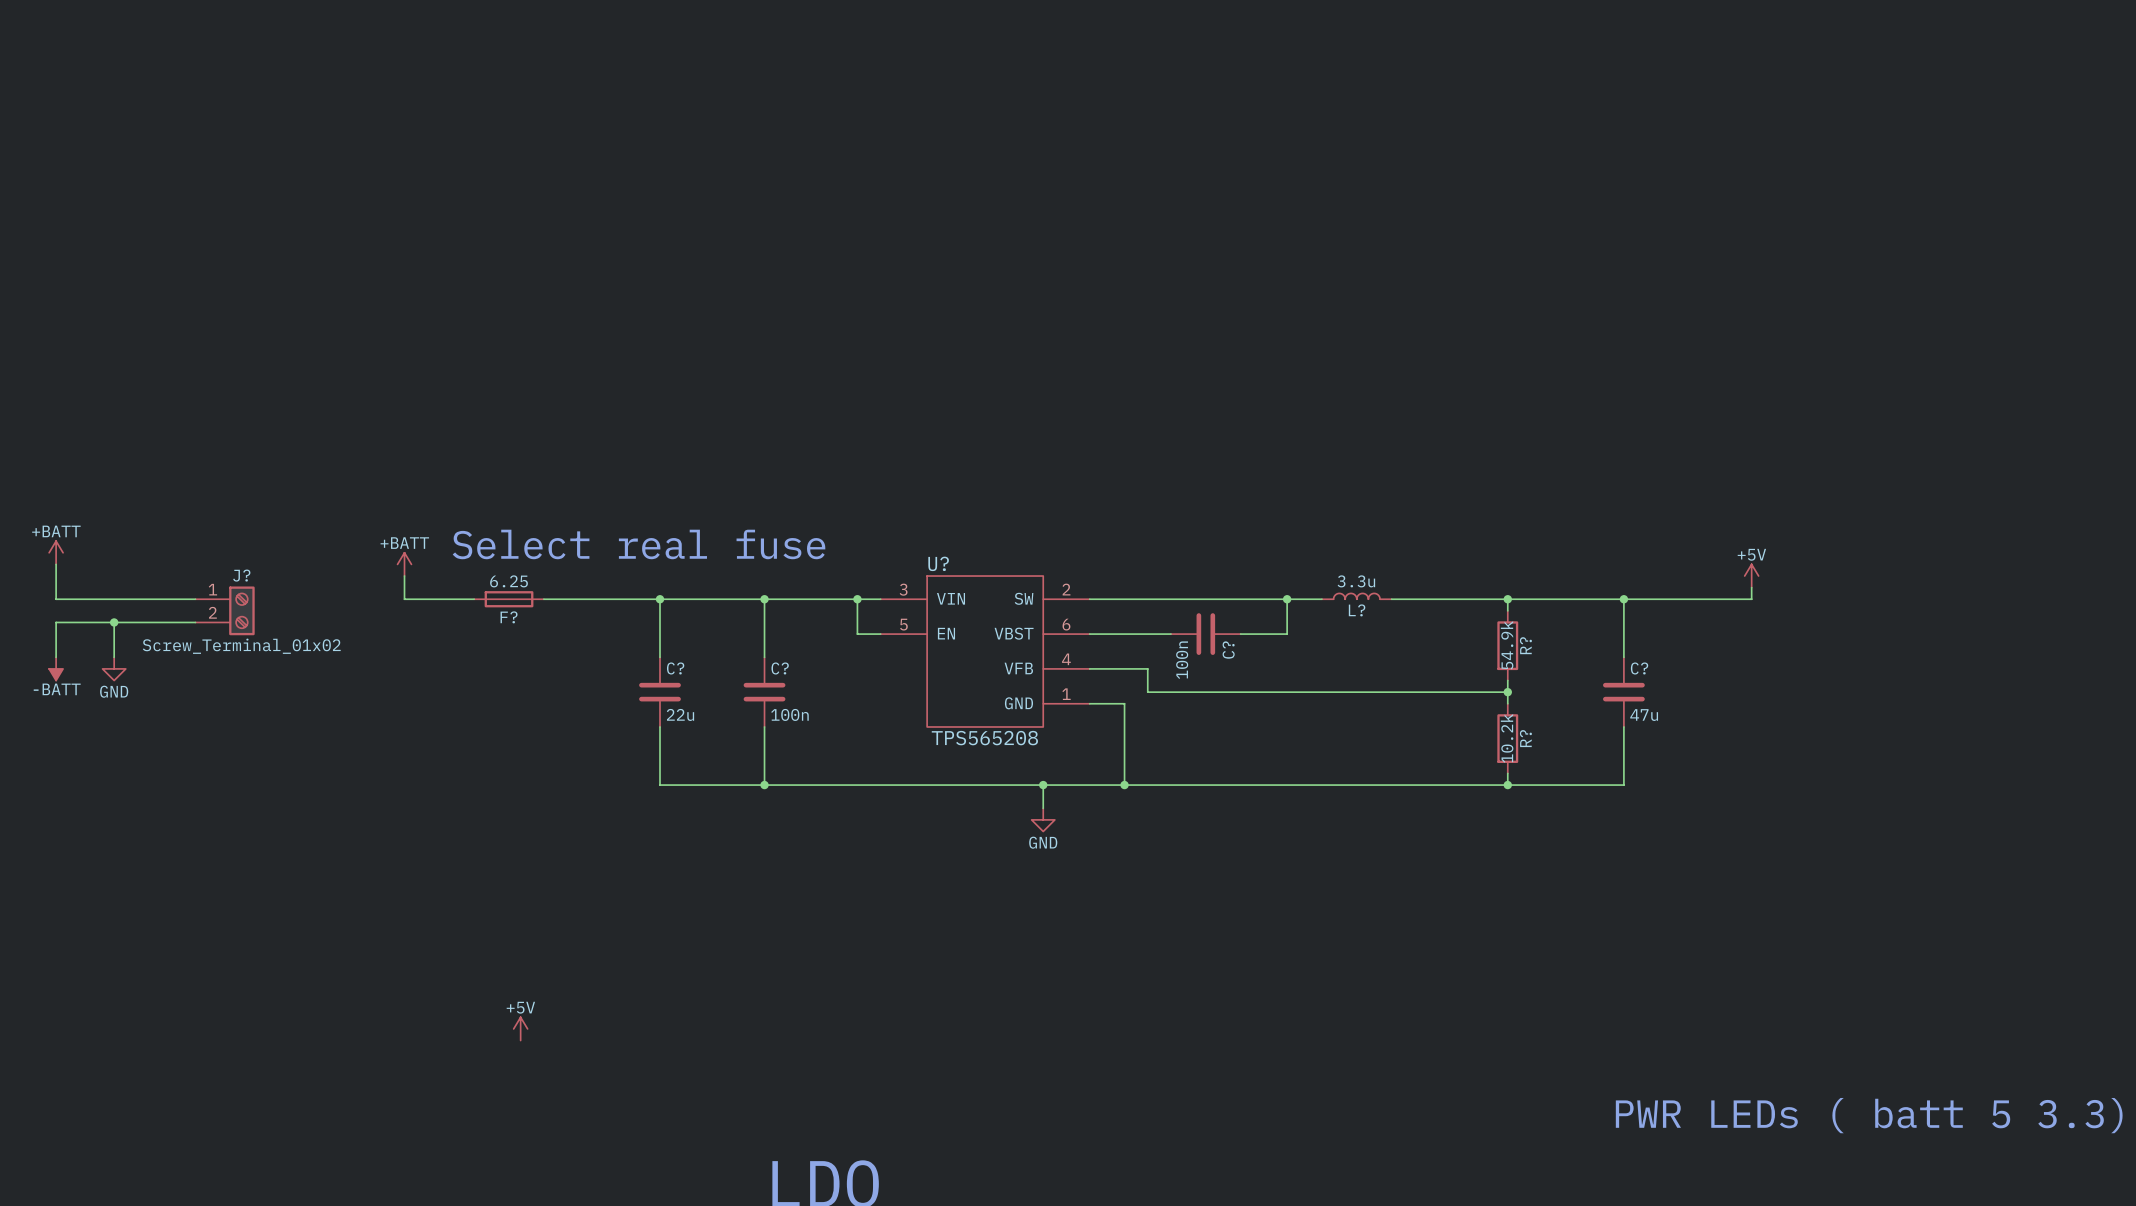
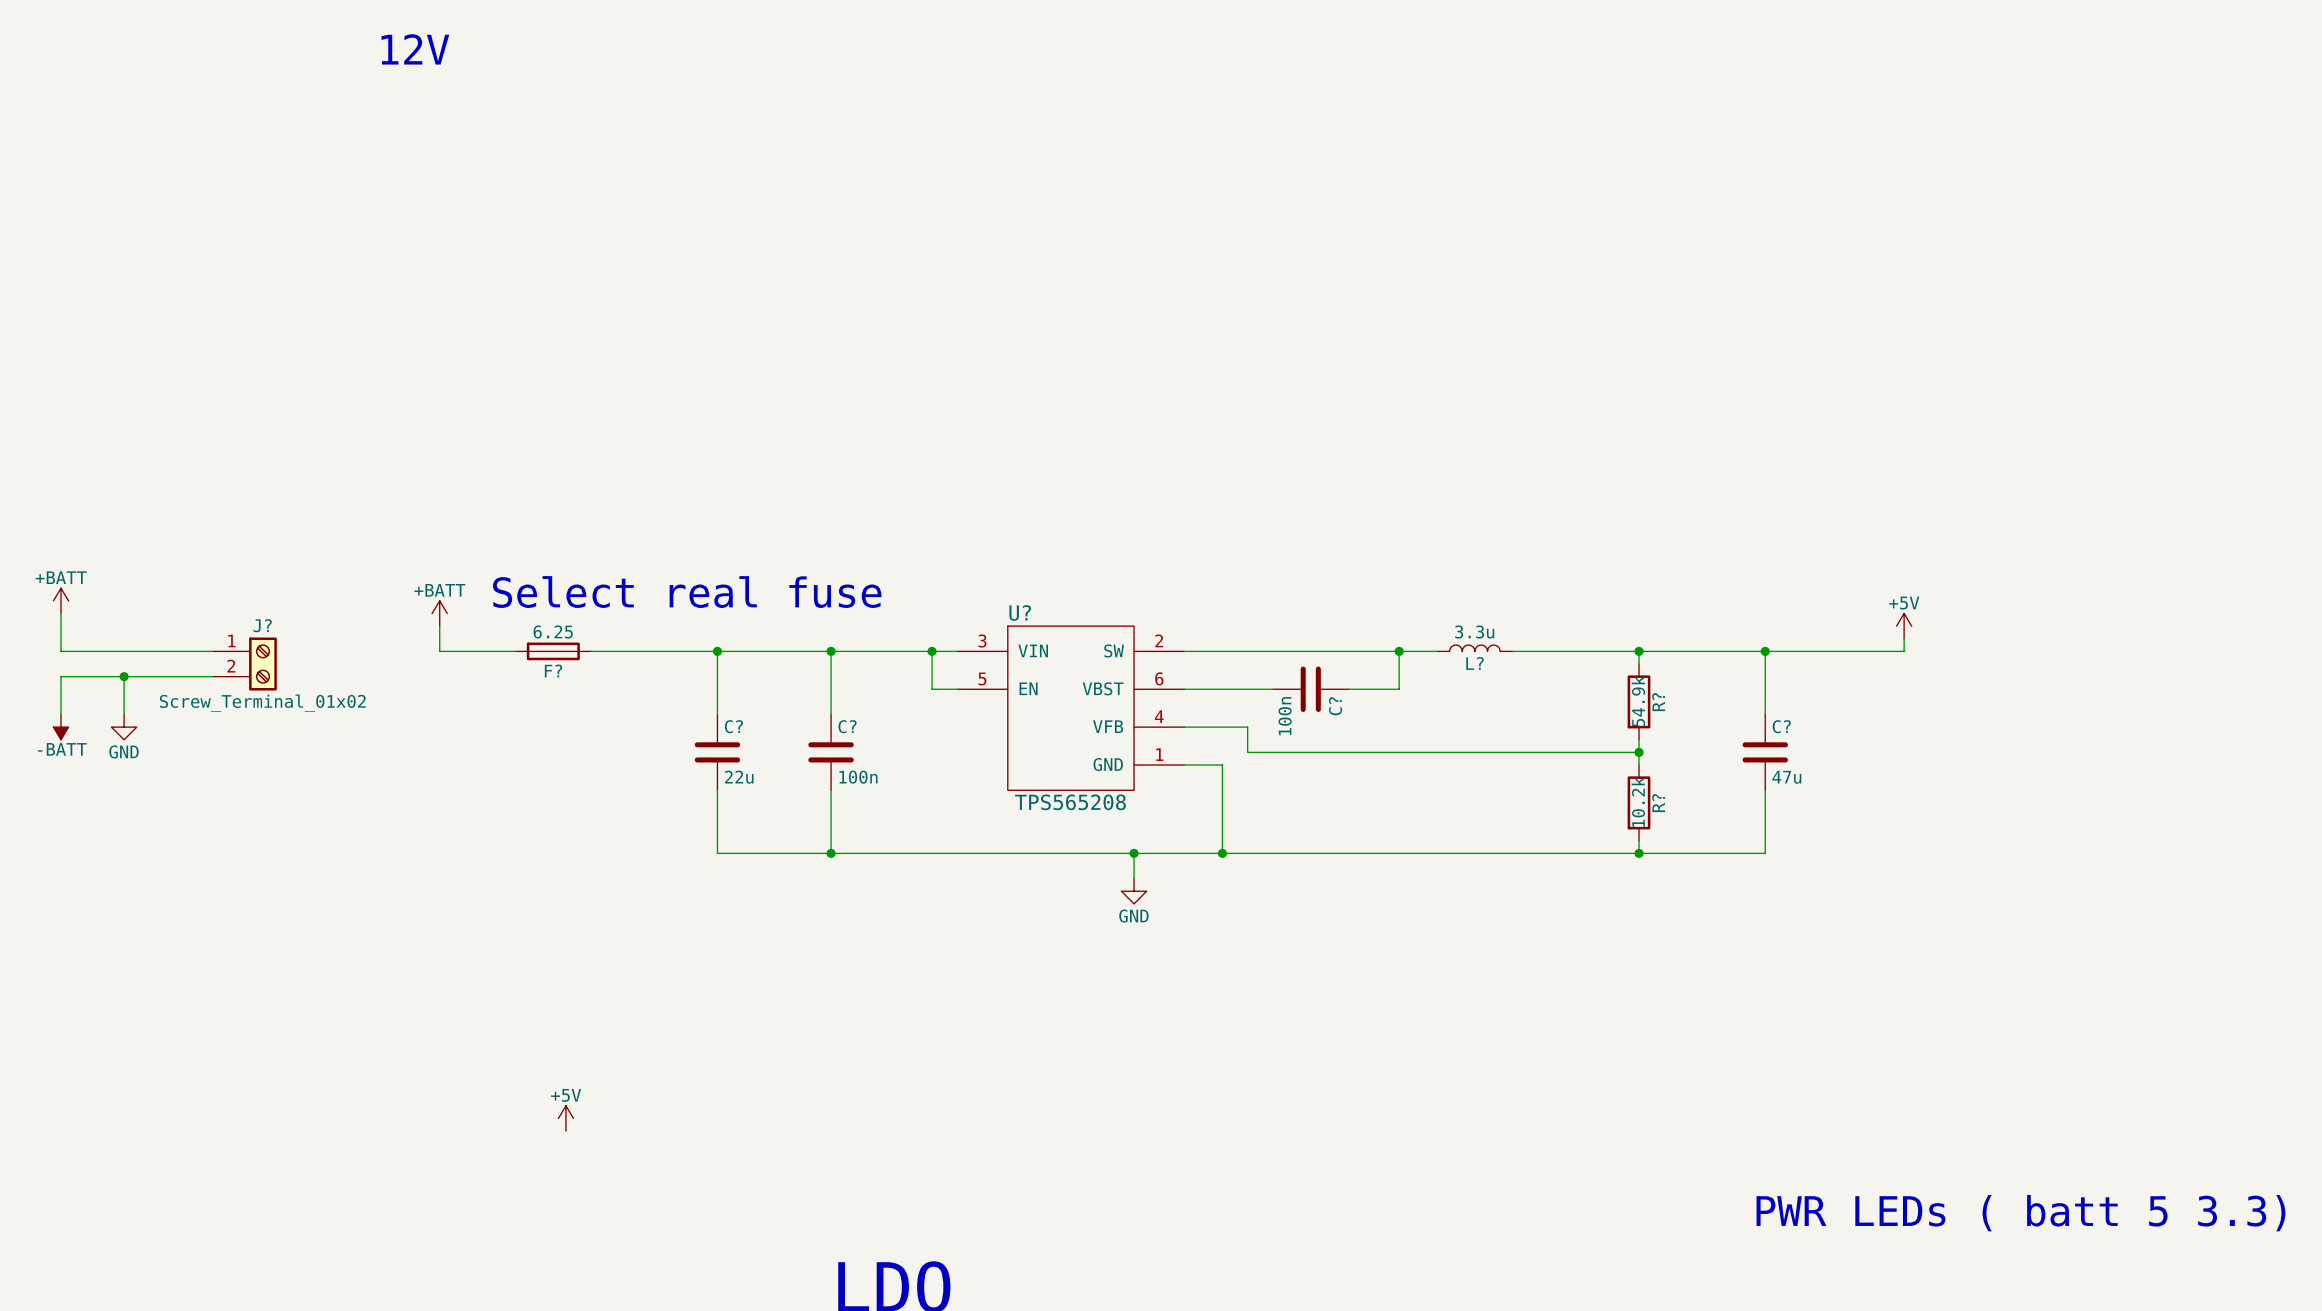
text: none -> 12V (415, 49)

